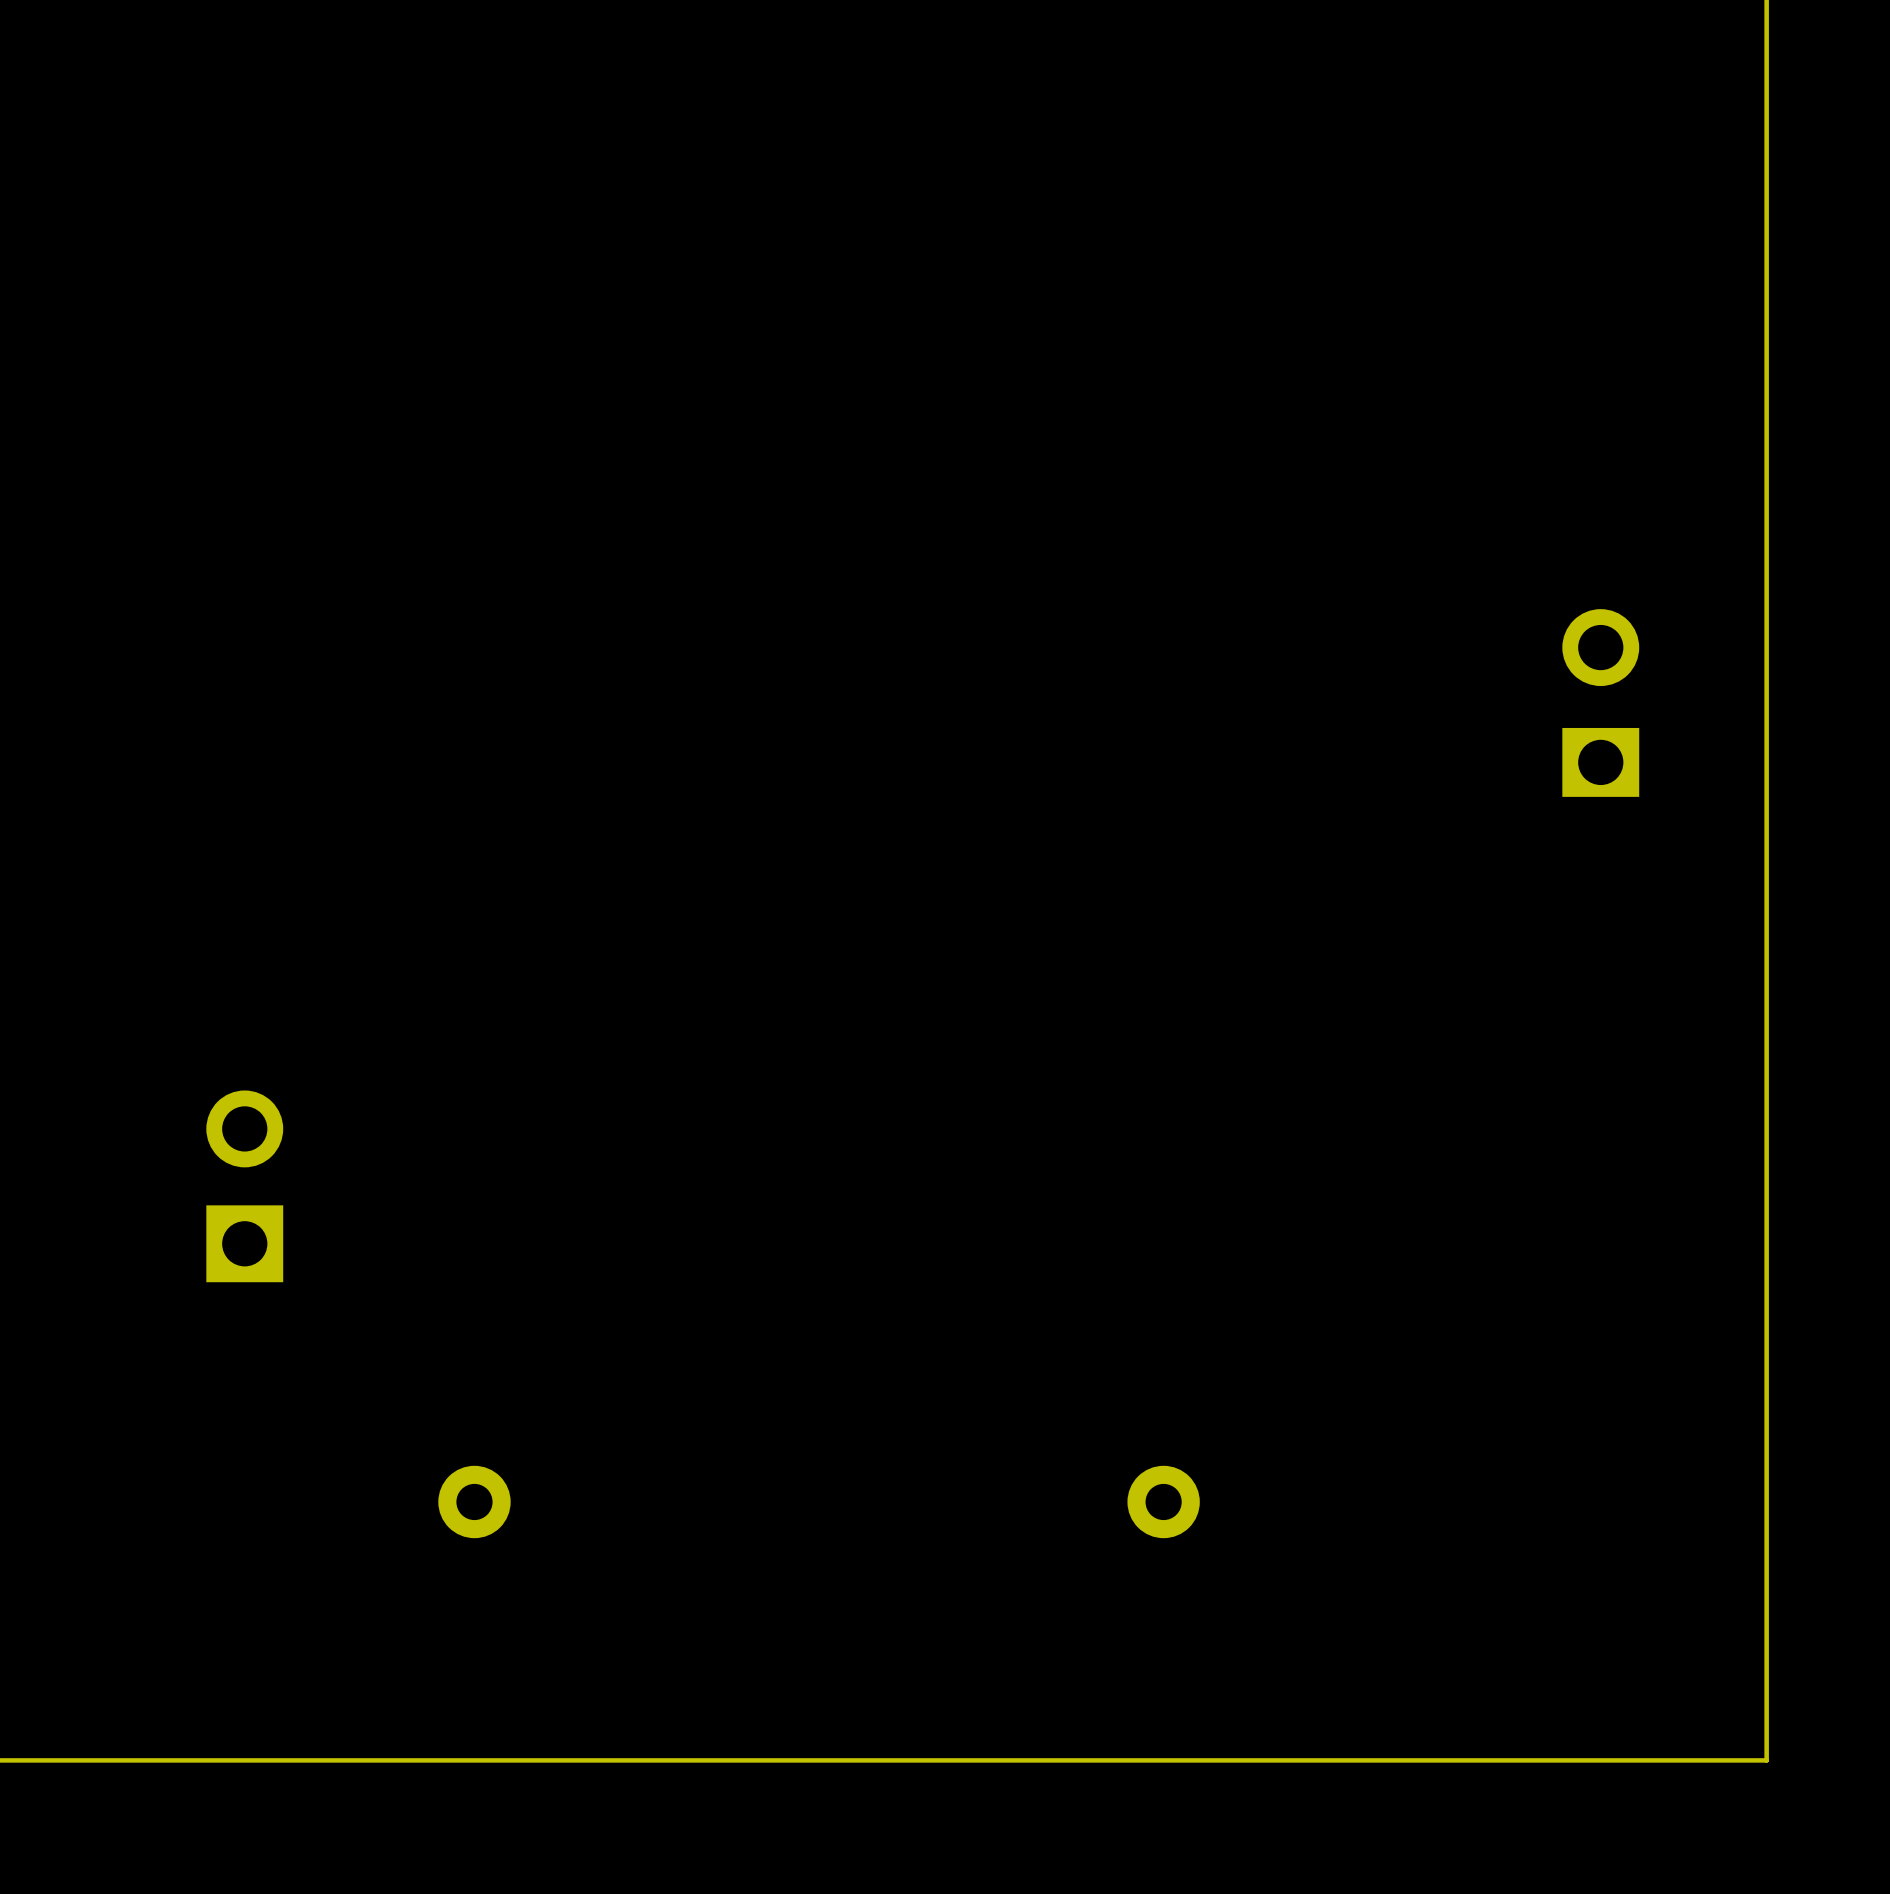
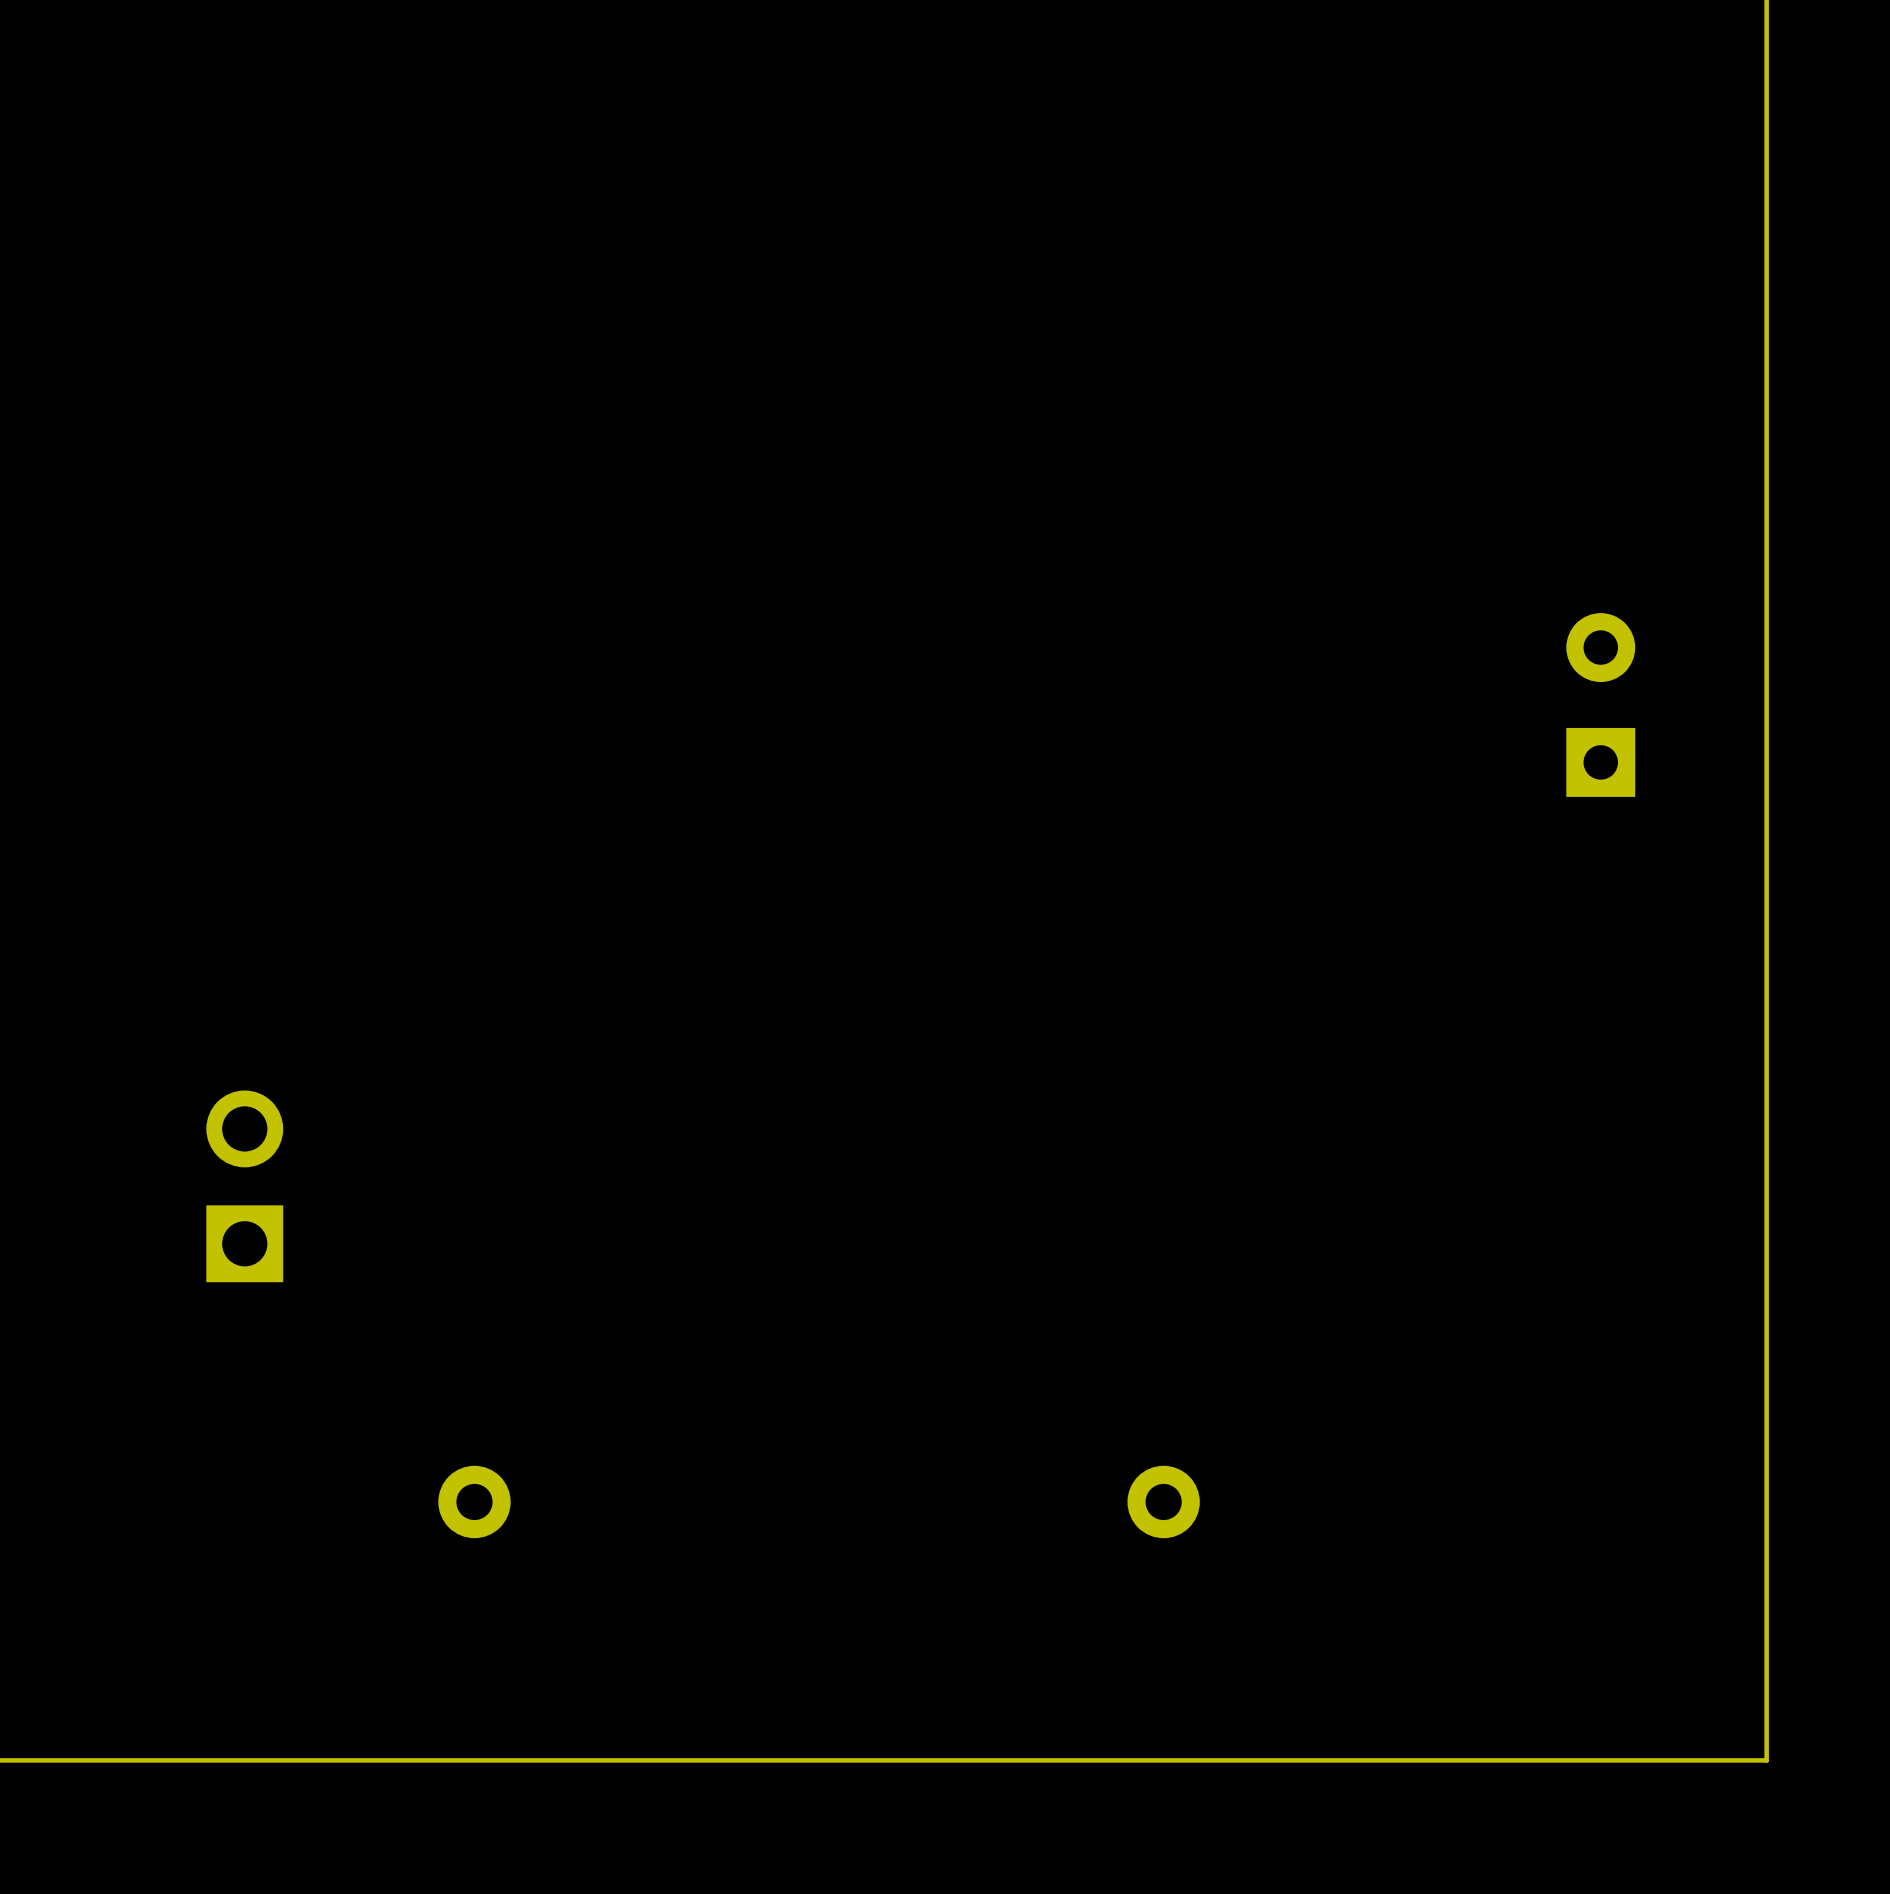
part footprint: [1562, 609, 1640, 797] -> [1566, 613, 1636, 797]

